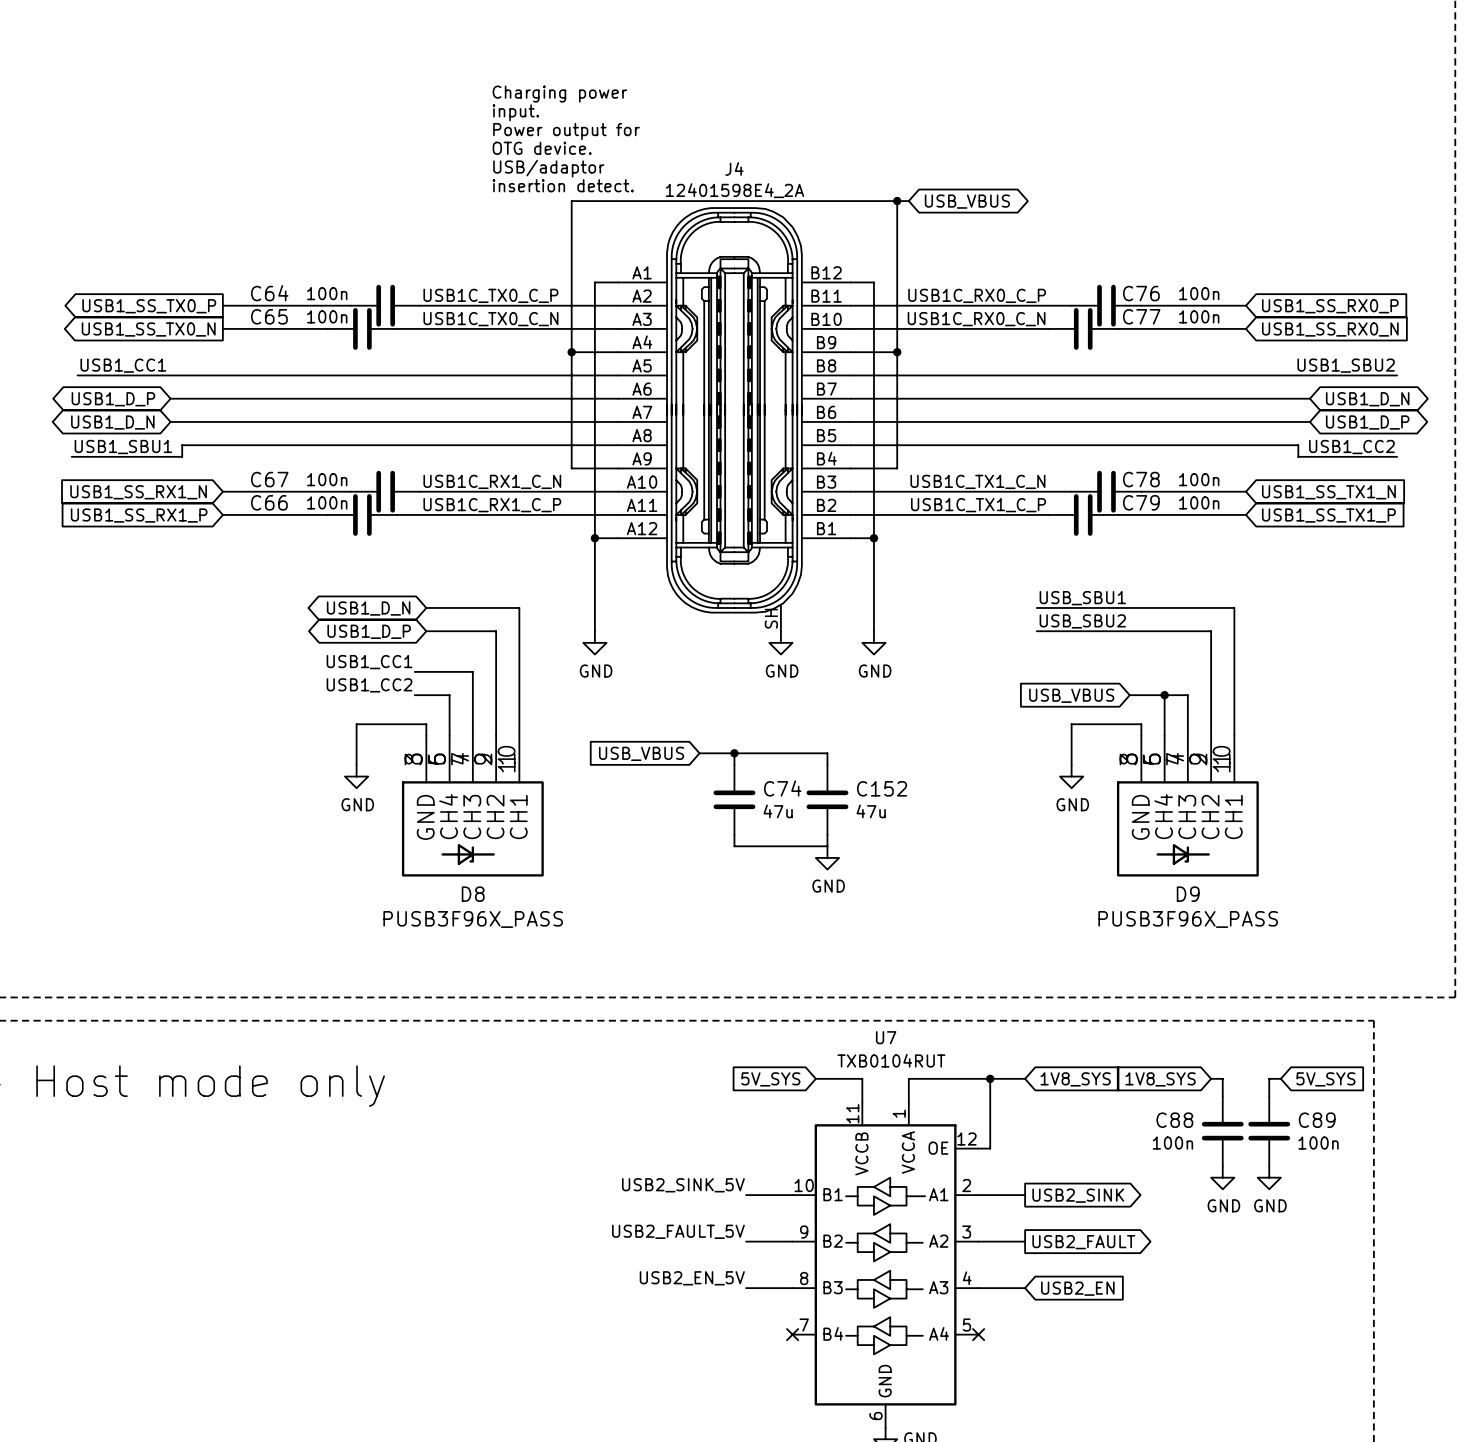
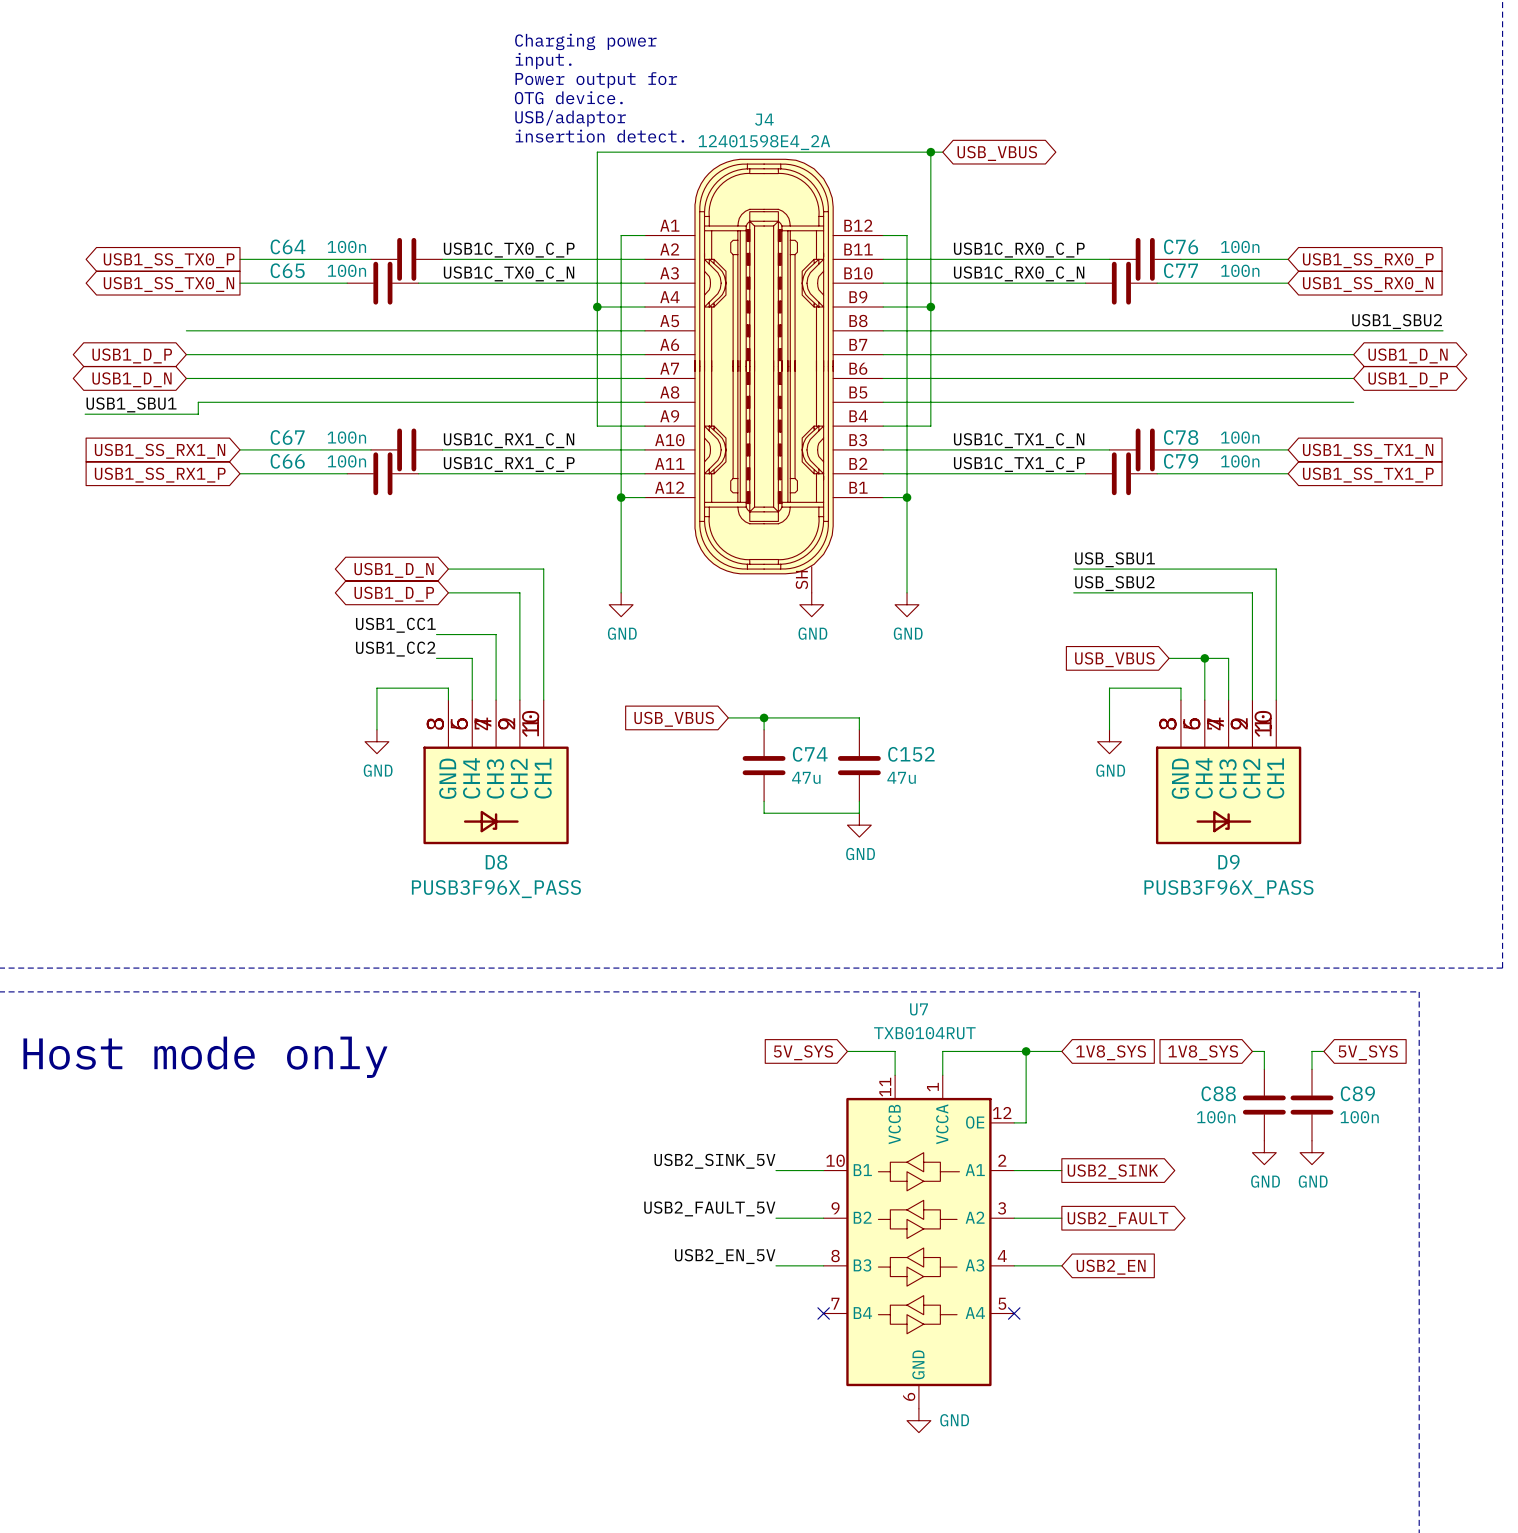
label: USB1_CC1 (123, 365) -> none
wire: (77, 375) (170, 375) -> none
wire: (1298, 445) (1298, 456) (1397, 456) -> (1341, 402) (1353, 402)
label: USB1_CC2 (1351, 447) -> none

